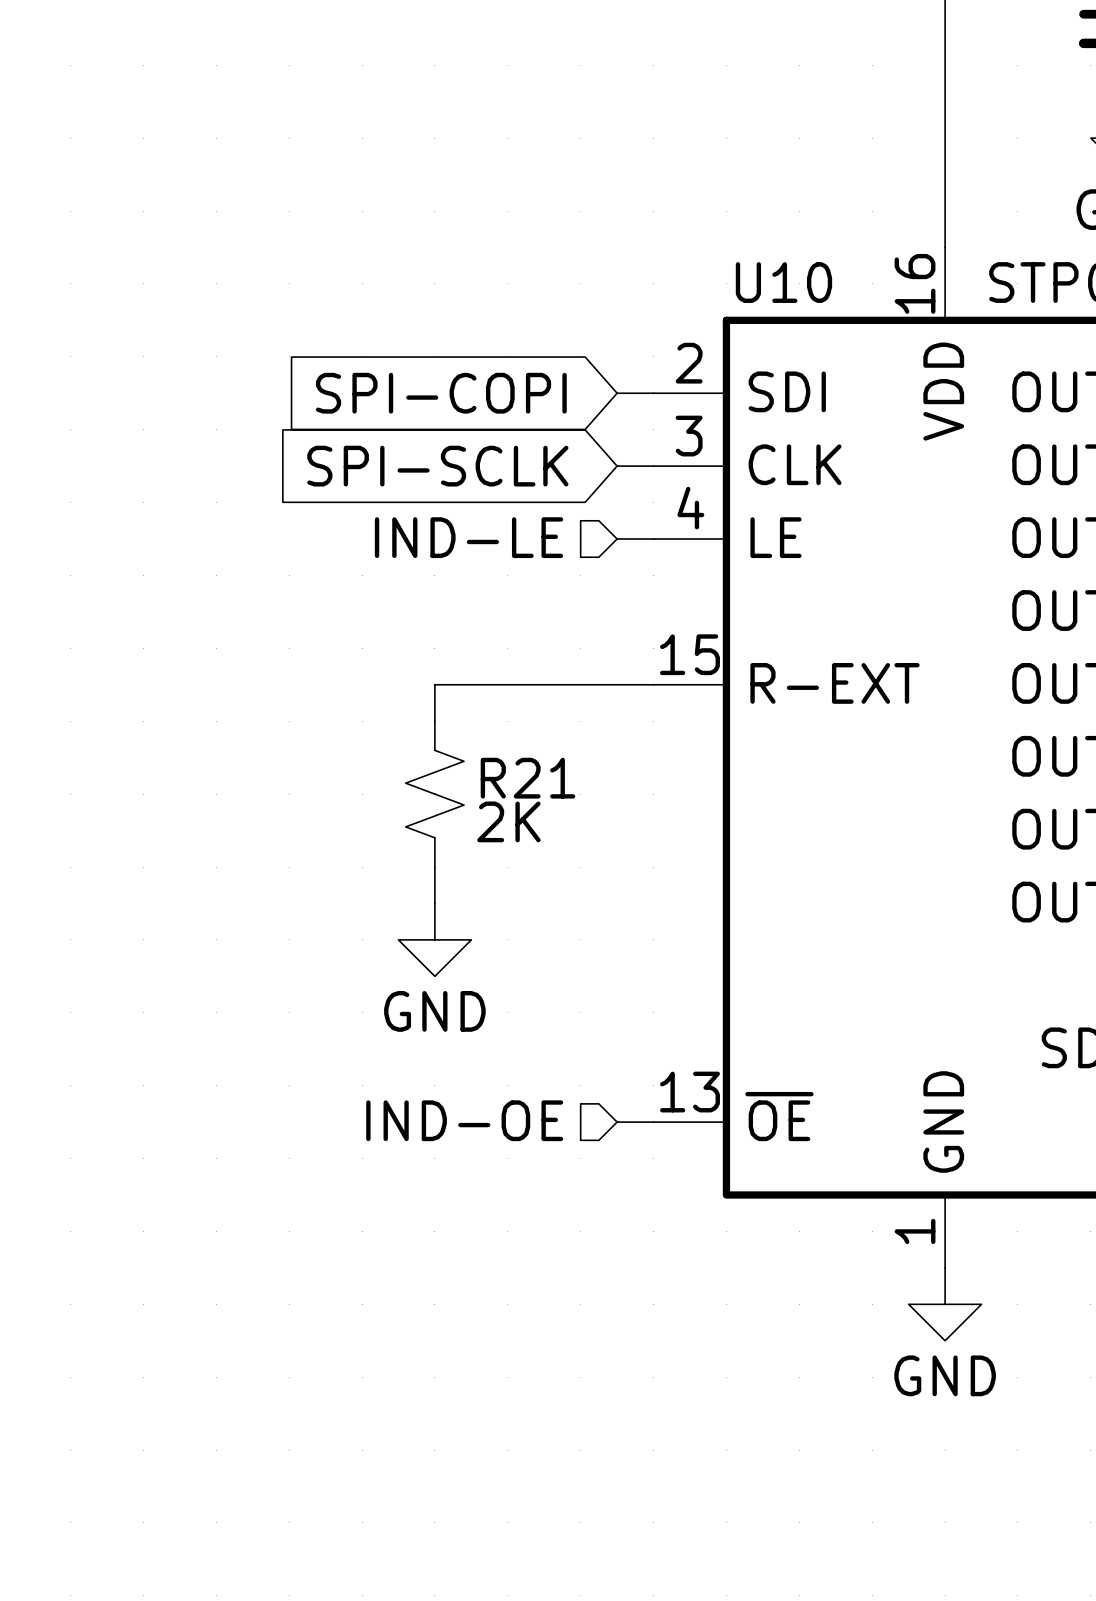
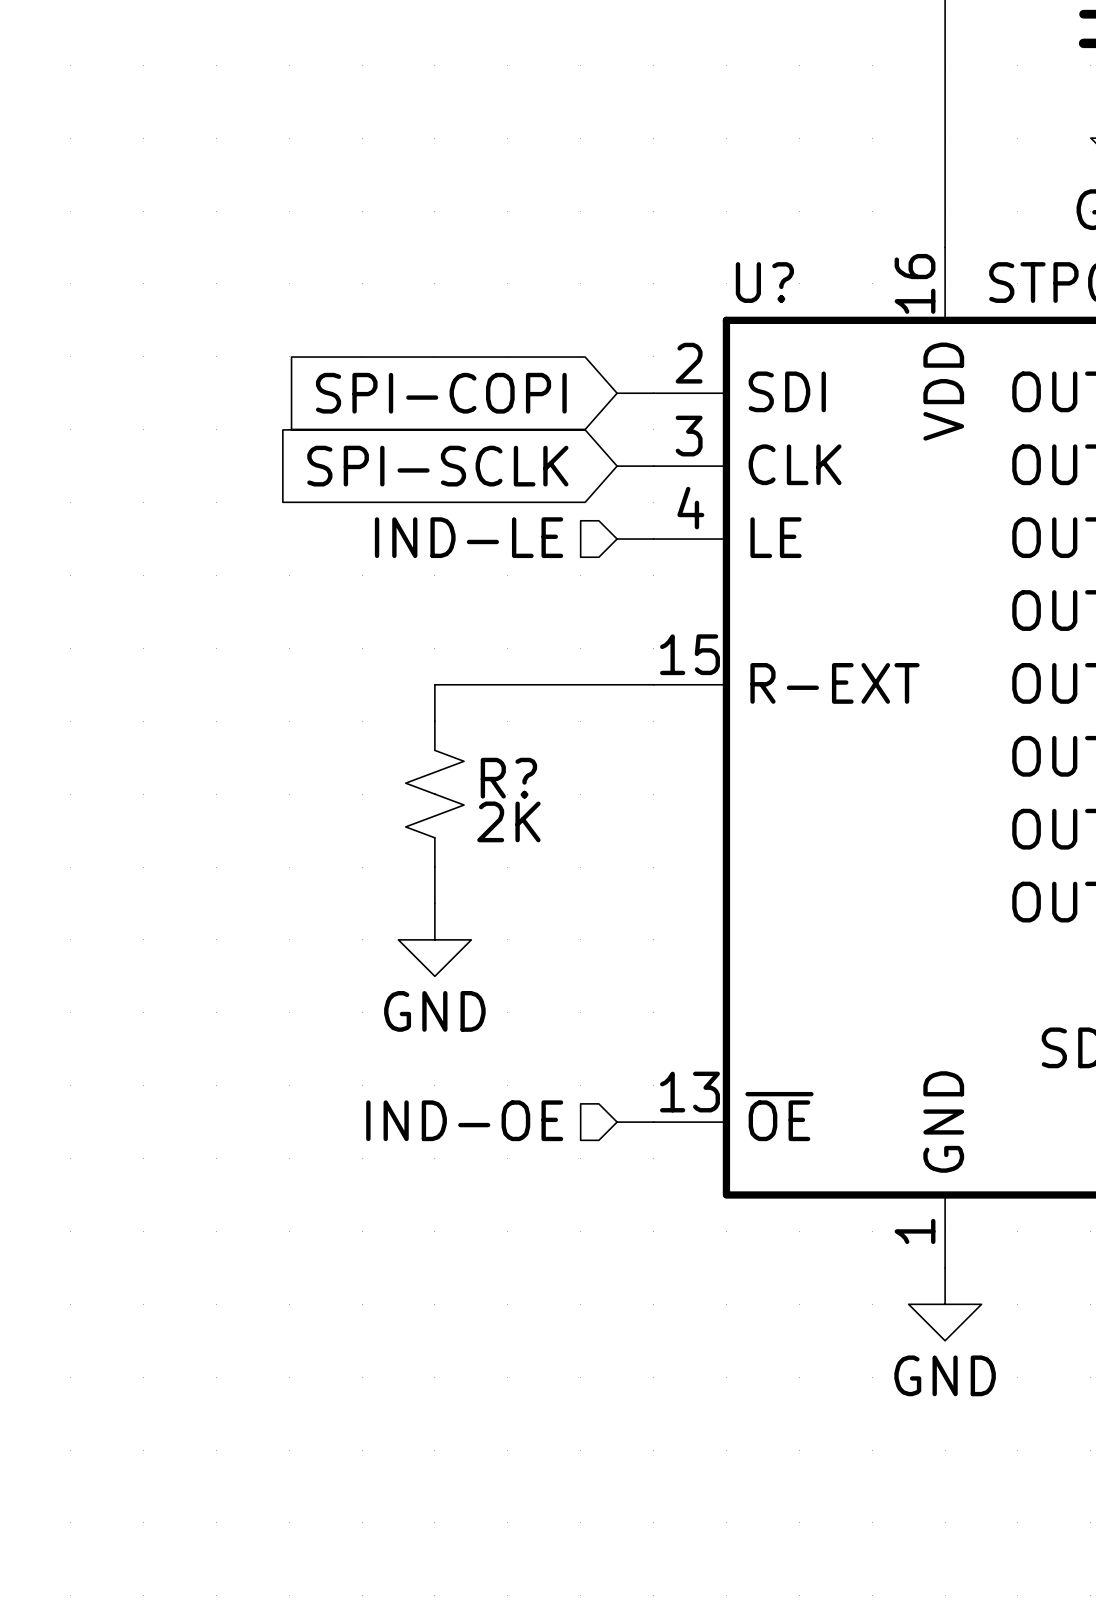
U10 name: U10 (783, 282) -> U? (764, 282)
R21 name: R21 (528, 778) -> R? (508, 778)

